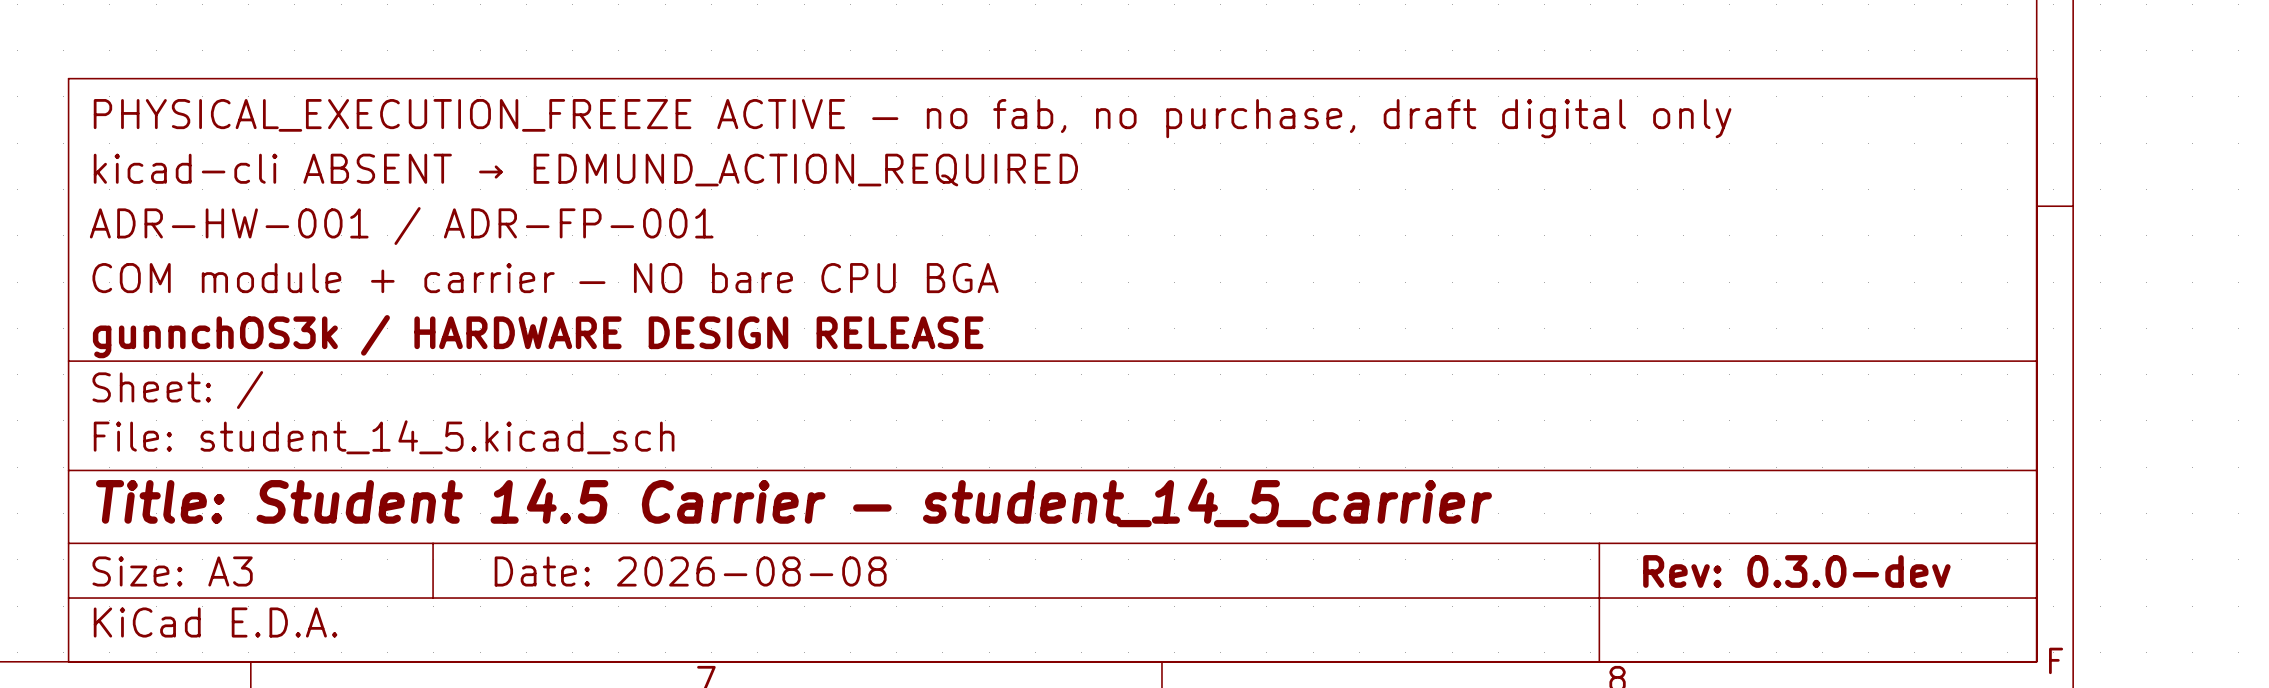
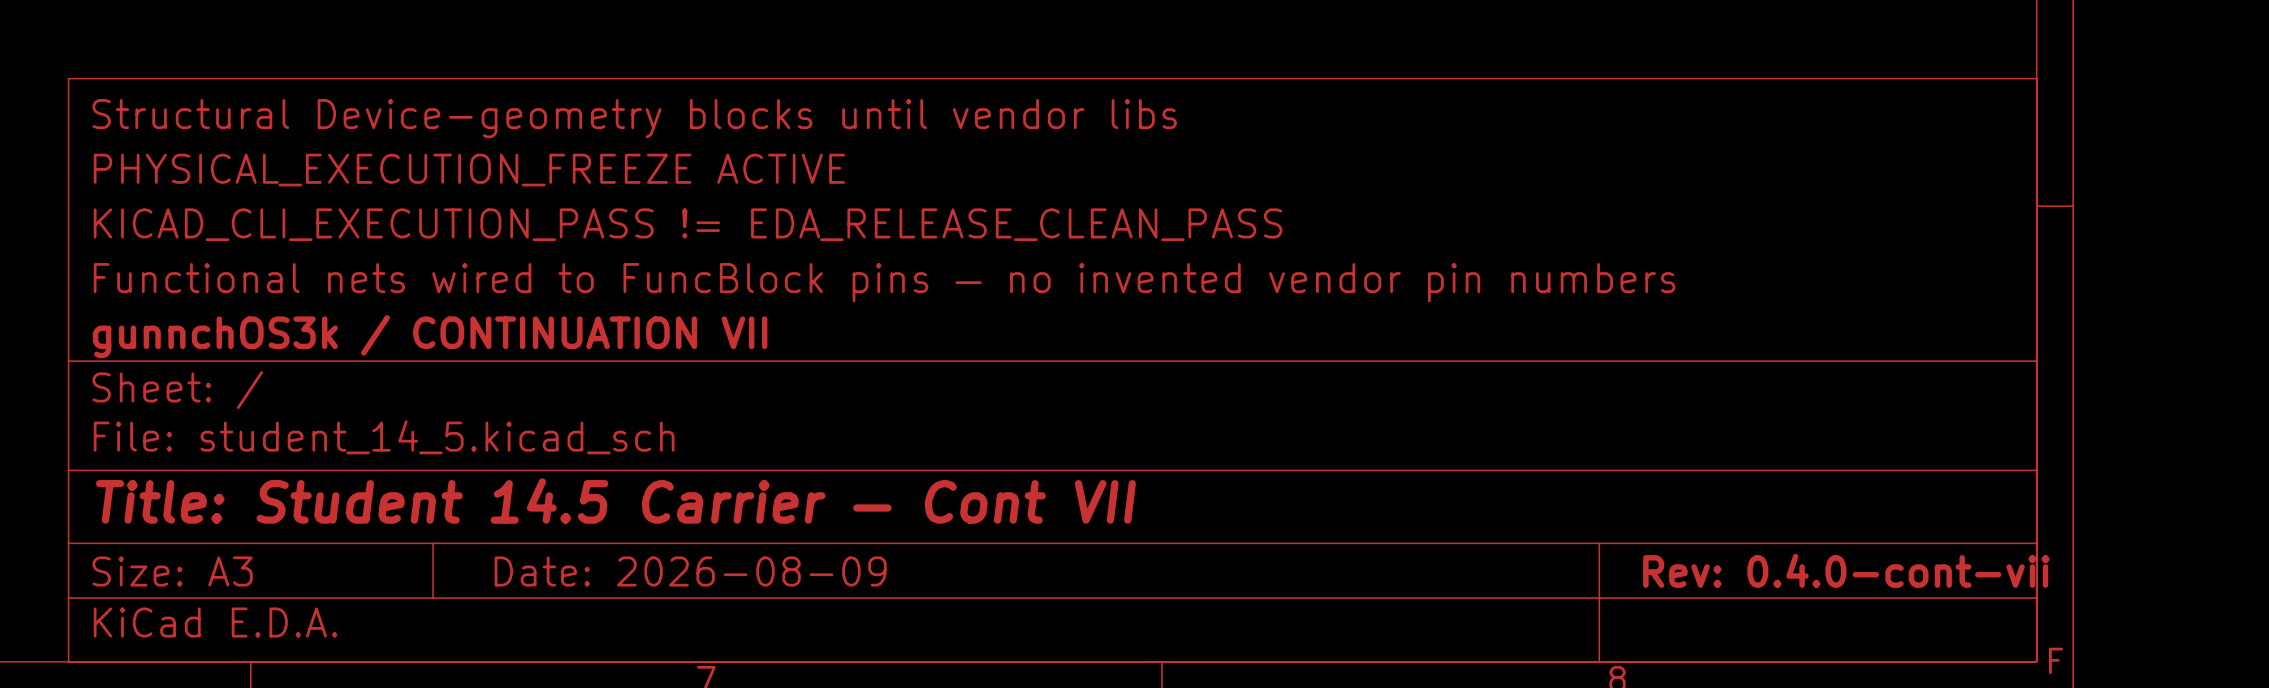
title block: PHYSICAL_EXECUTION_FREEZE ACTIVE — no fab, no purchase, draft digital only (912, 118) -> Structural Device-geometry blocks until vendor libs (634, 118)
title block: kicad-cli ABSENT → EDMUND_ACTION_REQUIRED (585, 170) -> PHYSICAL_EXECUTION_FREEZE ACTIVE (469, 170)
title block: ADR-HW-001 / ADR-FP-001 (401, 226) -> KICAD_CLI_EXECUTION_PASS != EDA_RELEASE_CLEAN_PASS (688, 224)
title block: COM module + carrier — NO bare CPU BGA (545, 278) -> Functional nets wired to FuncBlock pins — no invented vendor pin numbers (884, 282)
title block: gunnchOS3k / HARDWARE DESIGN RELEASE (538, 336) -> gunnchOS3k / CONTINUATION VII (430, 336)
title block: Title: Student 14.5 Carrier — student_14_5_carrier (793, 502) -> Title: Student 14.5 Carrier — Cont VII (615, 501)
title block: Date: 2026-08-08 (690, 571) -> Date: 2026-08-09 (690, 571)
title block: Rev: 0.3.0-dev (1796, 571) -> Rev: 0.4.0-cont-vii (1846, 570)

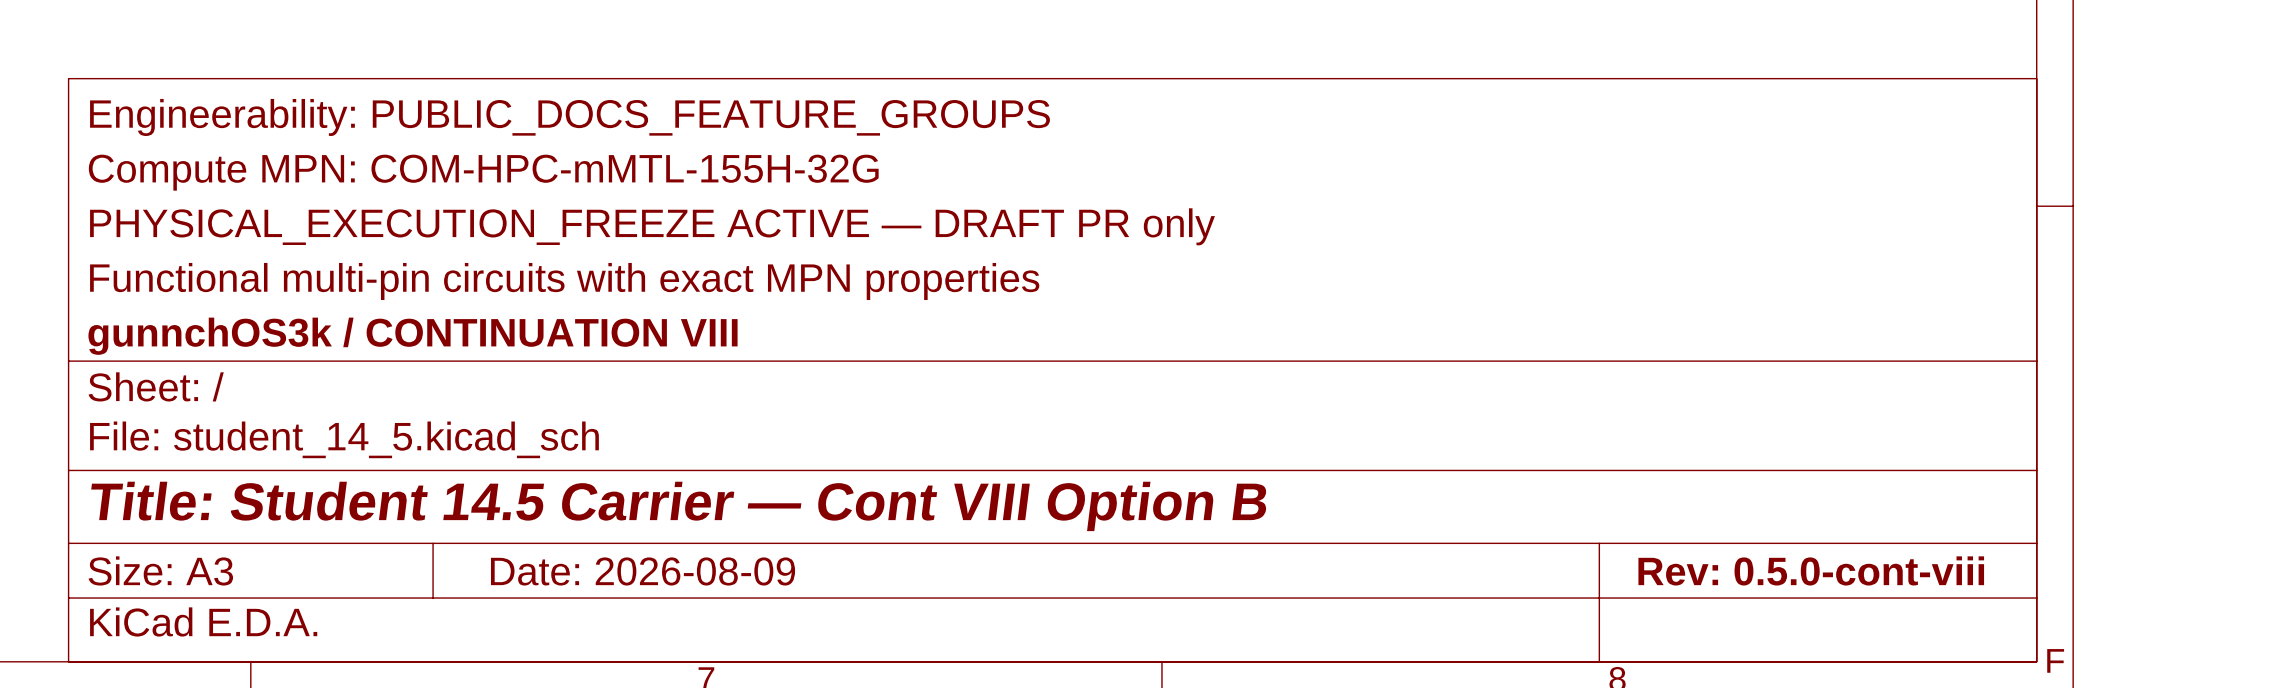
title block: Structural Device-geometry blocks until vendor libs (634, 118) -> Engineerability: PUBLIC_DOCS_FEATURE_GROUPS (570, 117)
title block: PHYSICAL_EXECUTION_FREEZE ACTIVE (469, 170) -> Compute MPN: COM-HPC-mMTL-155H-32G (483, 172)
title block: KICAD_CLI_EXECUTION_PASS != EDA_RELEASE_CLEAN_PASS (688, 224) -> PHYSICAL_EXECUTION_FREEZE ACTIVE — DRAFT PR only (652, 226)
title block: Functional nets wired to FuncBlock pins — no invented vendor pin numbers (884, 282) -> Functional multi-pin circuits with exact MPN properties (564, 281)
title block: gunnchOS3k / CONTINUATION VII (430, 336) -> gunnchOS3k / CONTINUATION VIII (413, 336)
title block: Title: Student 14.5 Carrier — Cont VII (615, 501) -> Title: Student 14.5 Carrier — Cont VIII Option B (678, 506)
title block: Rev: 0.4.0-cont-vii (1846, 570) -> Rev: 0.5.0-cont-viii (1811, 570)

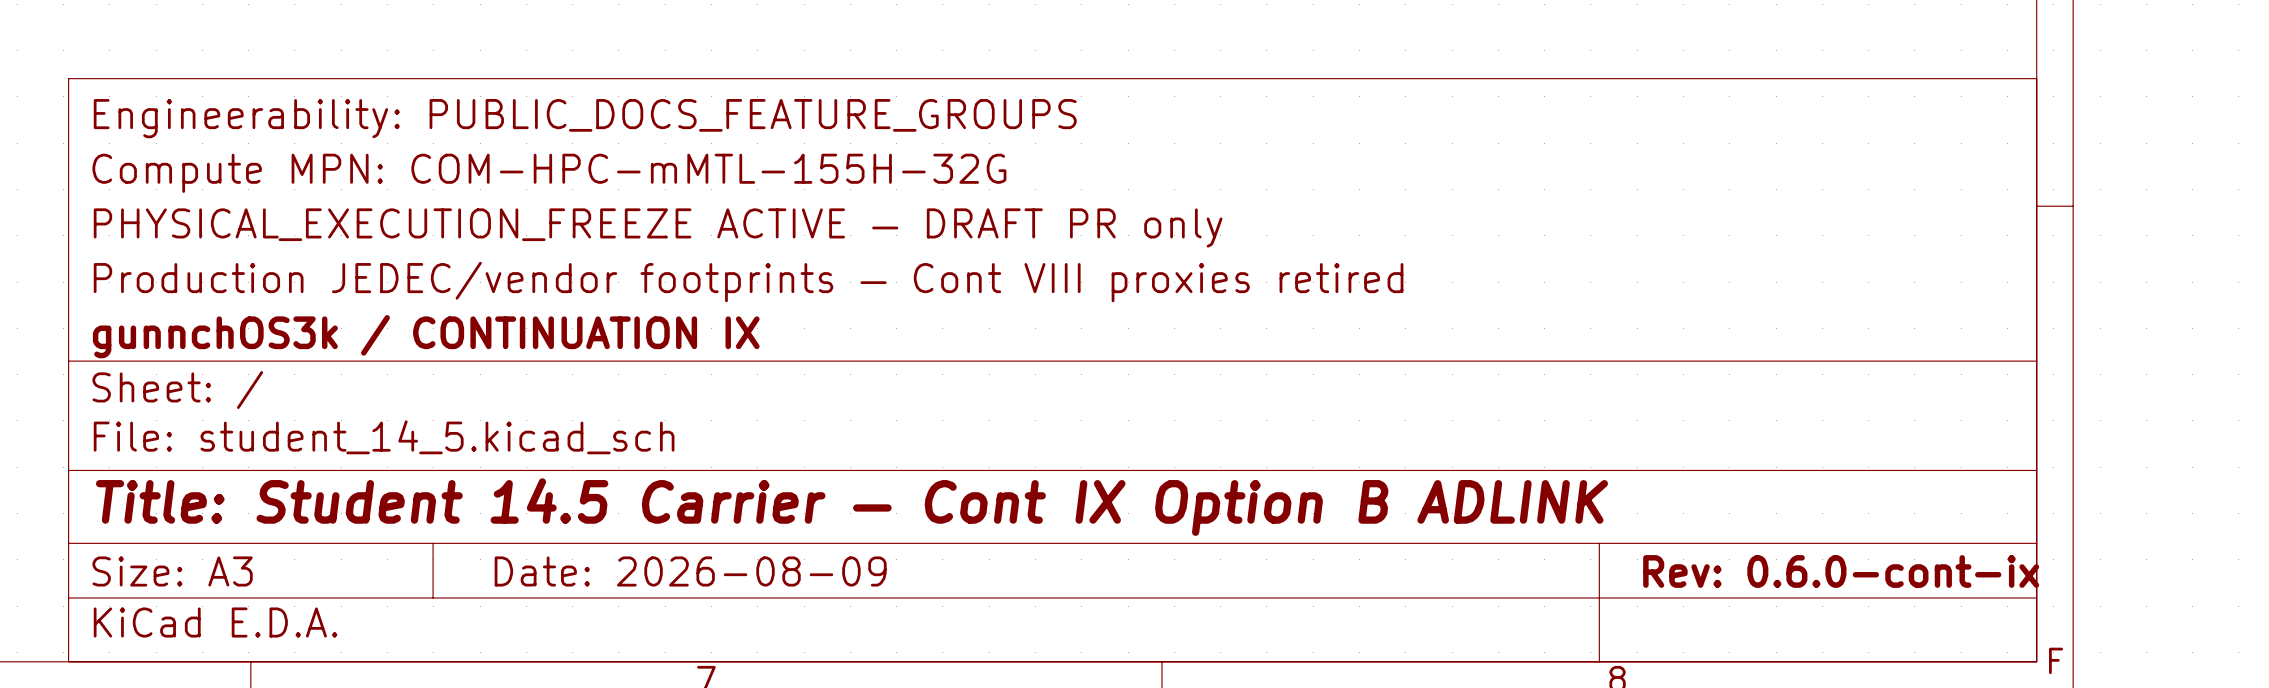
title block: Functional multi-pin circuits with exact MPN properties (564, 281) -> Production JEDEC/vendor footprints — Cont VIII proxies retired (748, 281)
title block: gunnchOS3k / CONTINUATION VIII (413, 336) -> gunnchOS3k / CONTINUATION IX (426, 336)
title block: Title: Student 14.5 Carrier — Cont VIII Option B (678, 506) -> Title: Student 14.5 Carrier — Cont IX Option B ADLINK (851, 507)
title block: Rev: 0.5.0-cont-viii (1811, 570) -> Rev: 0.6.0-cont-ix (1841, 571)

